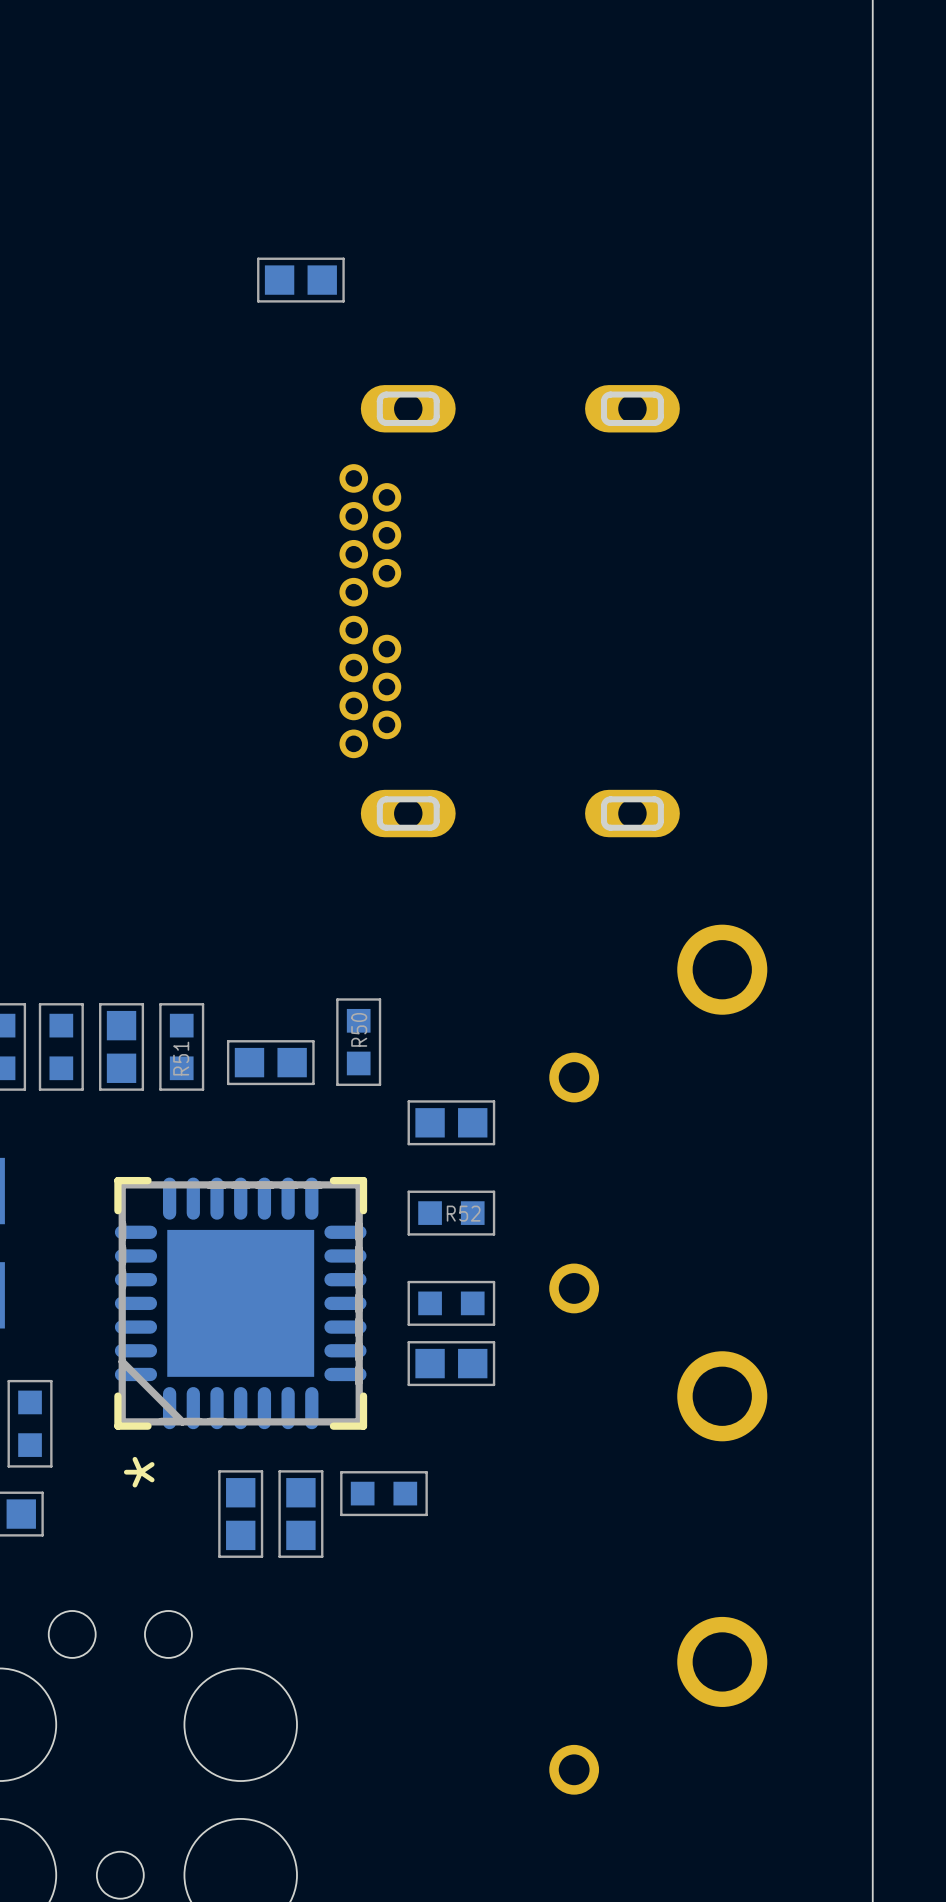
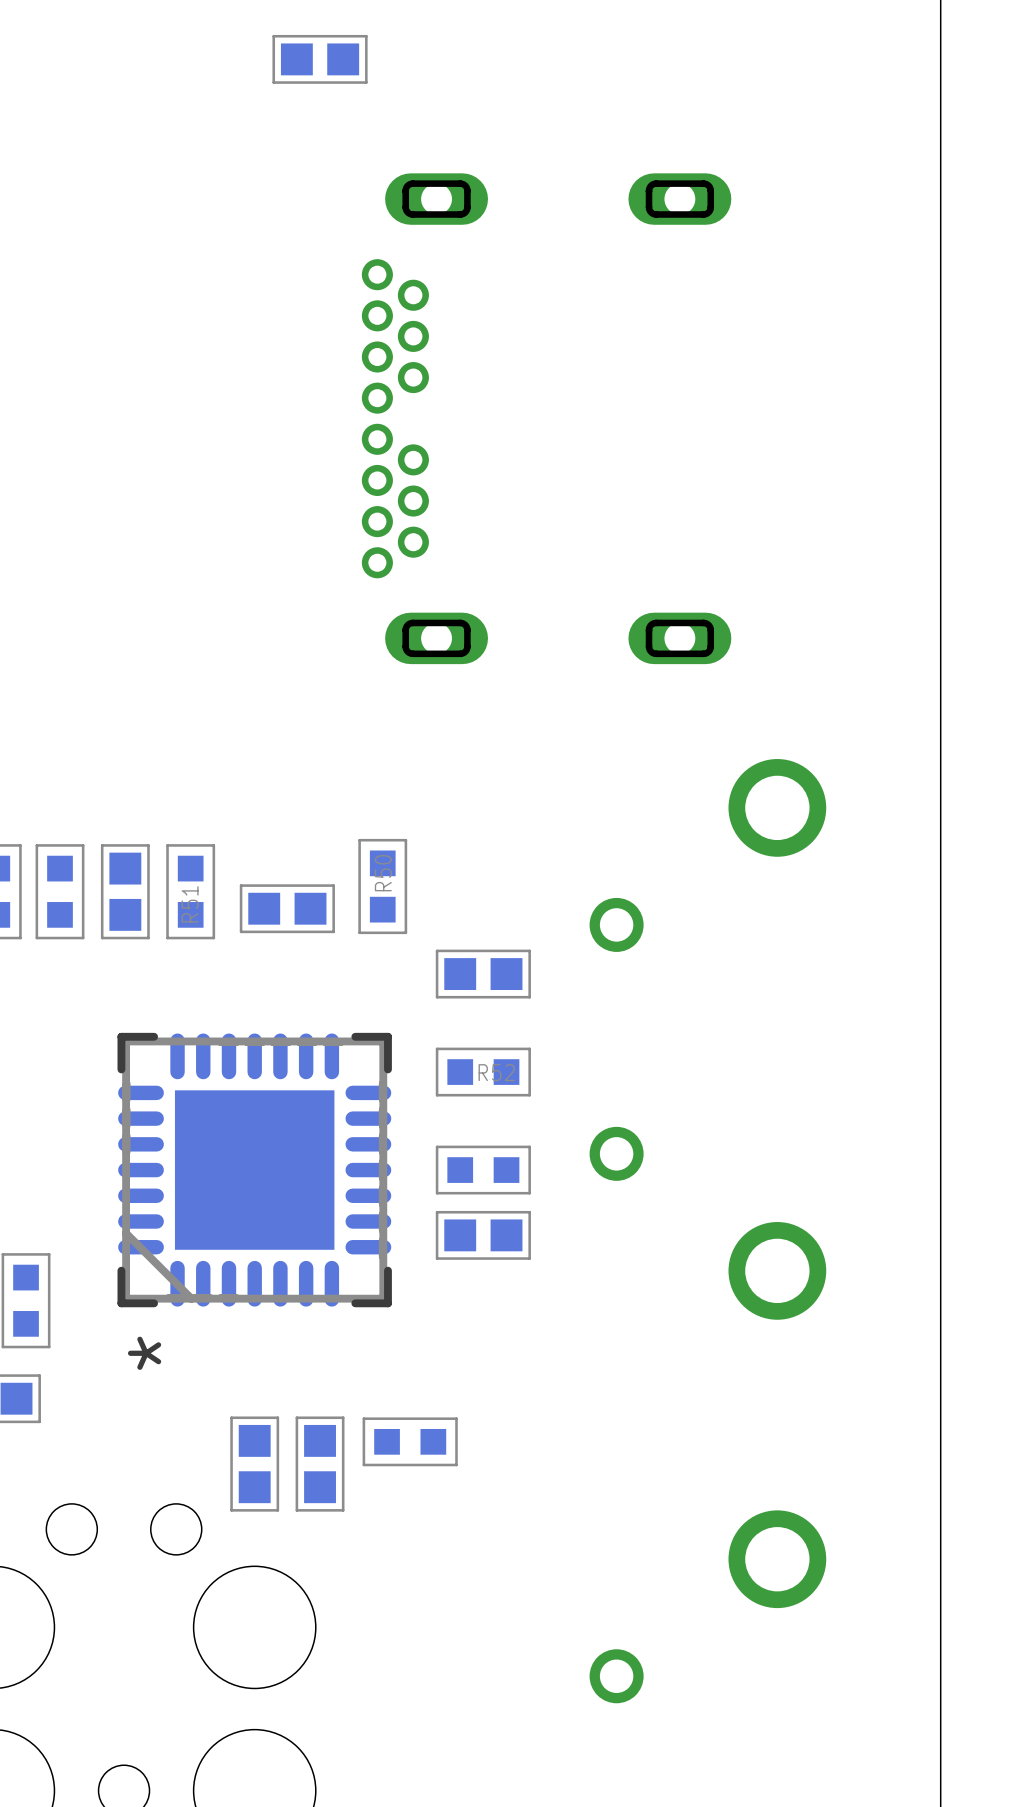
part position: (383, 1493) -> (410, 1441)
part: (240, 1514) -> none
part: (300, 1514) -> none
part: none -> (254, 1464)
part: none -> (320, 1464)

